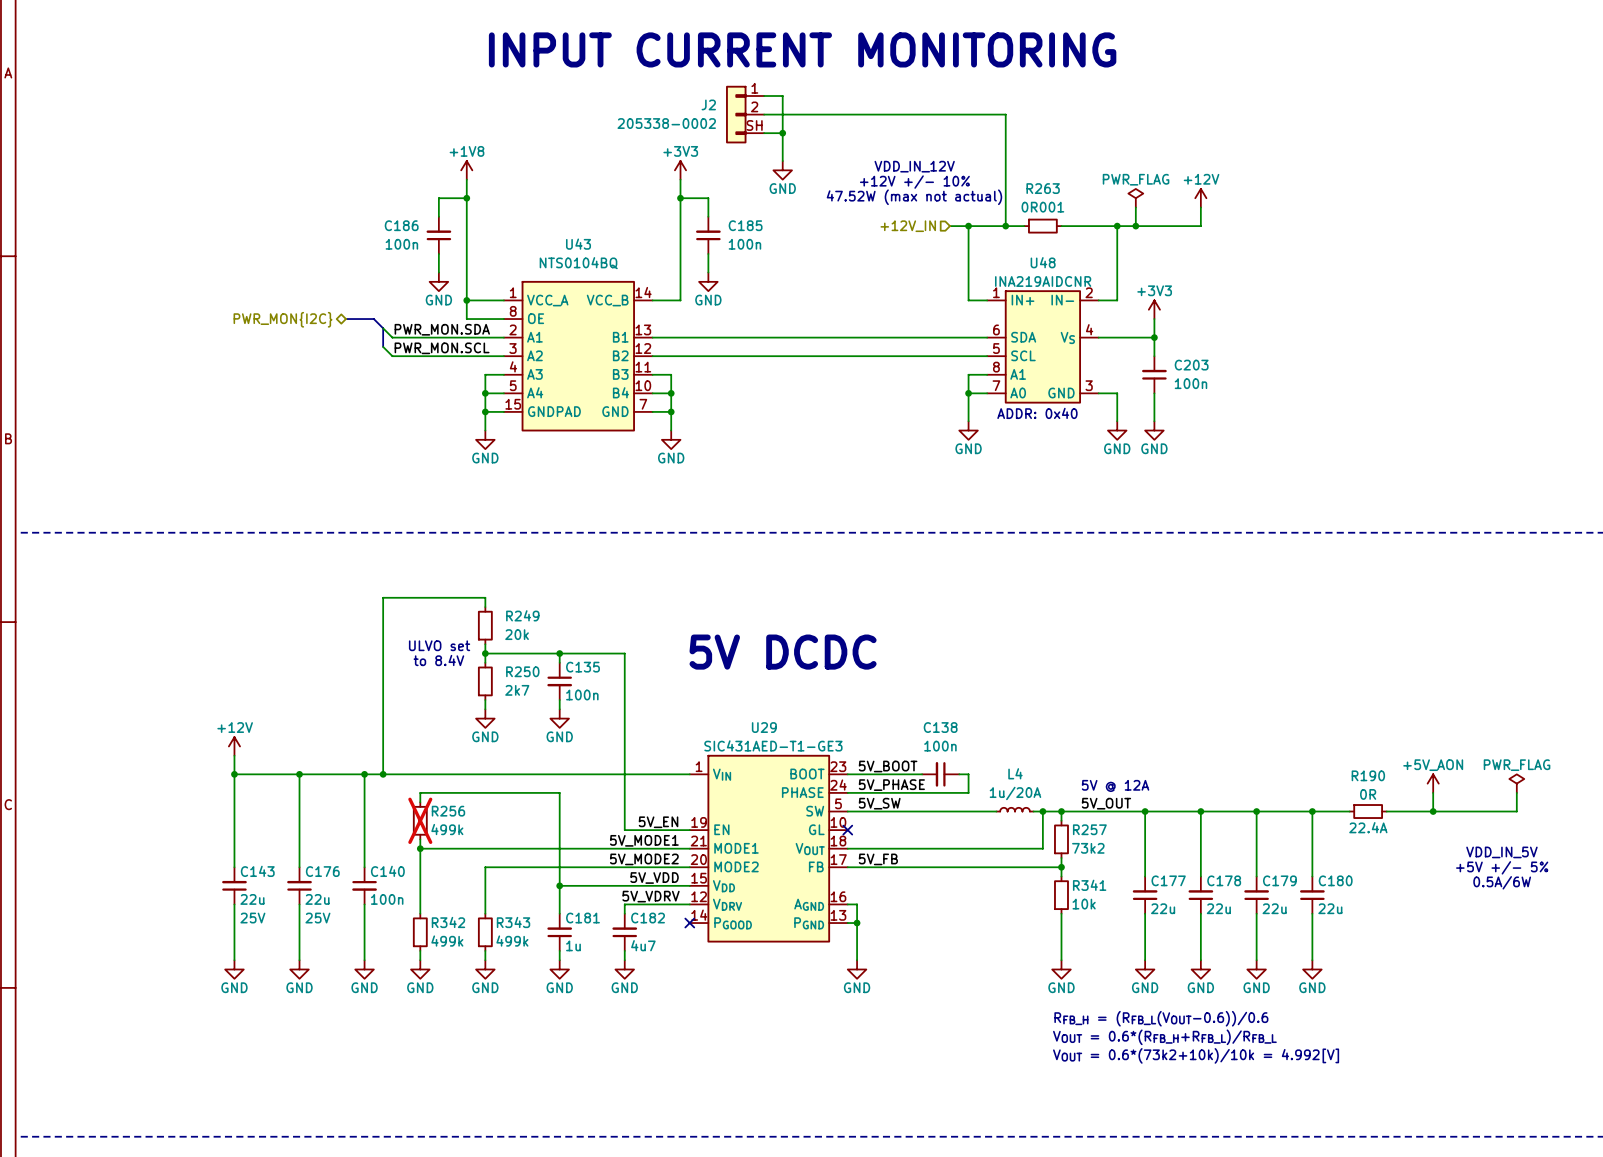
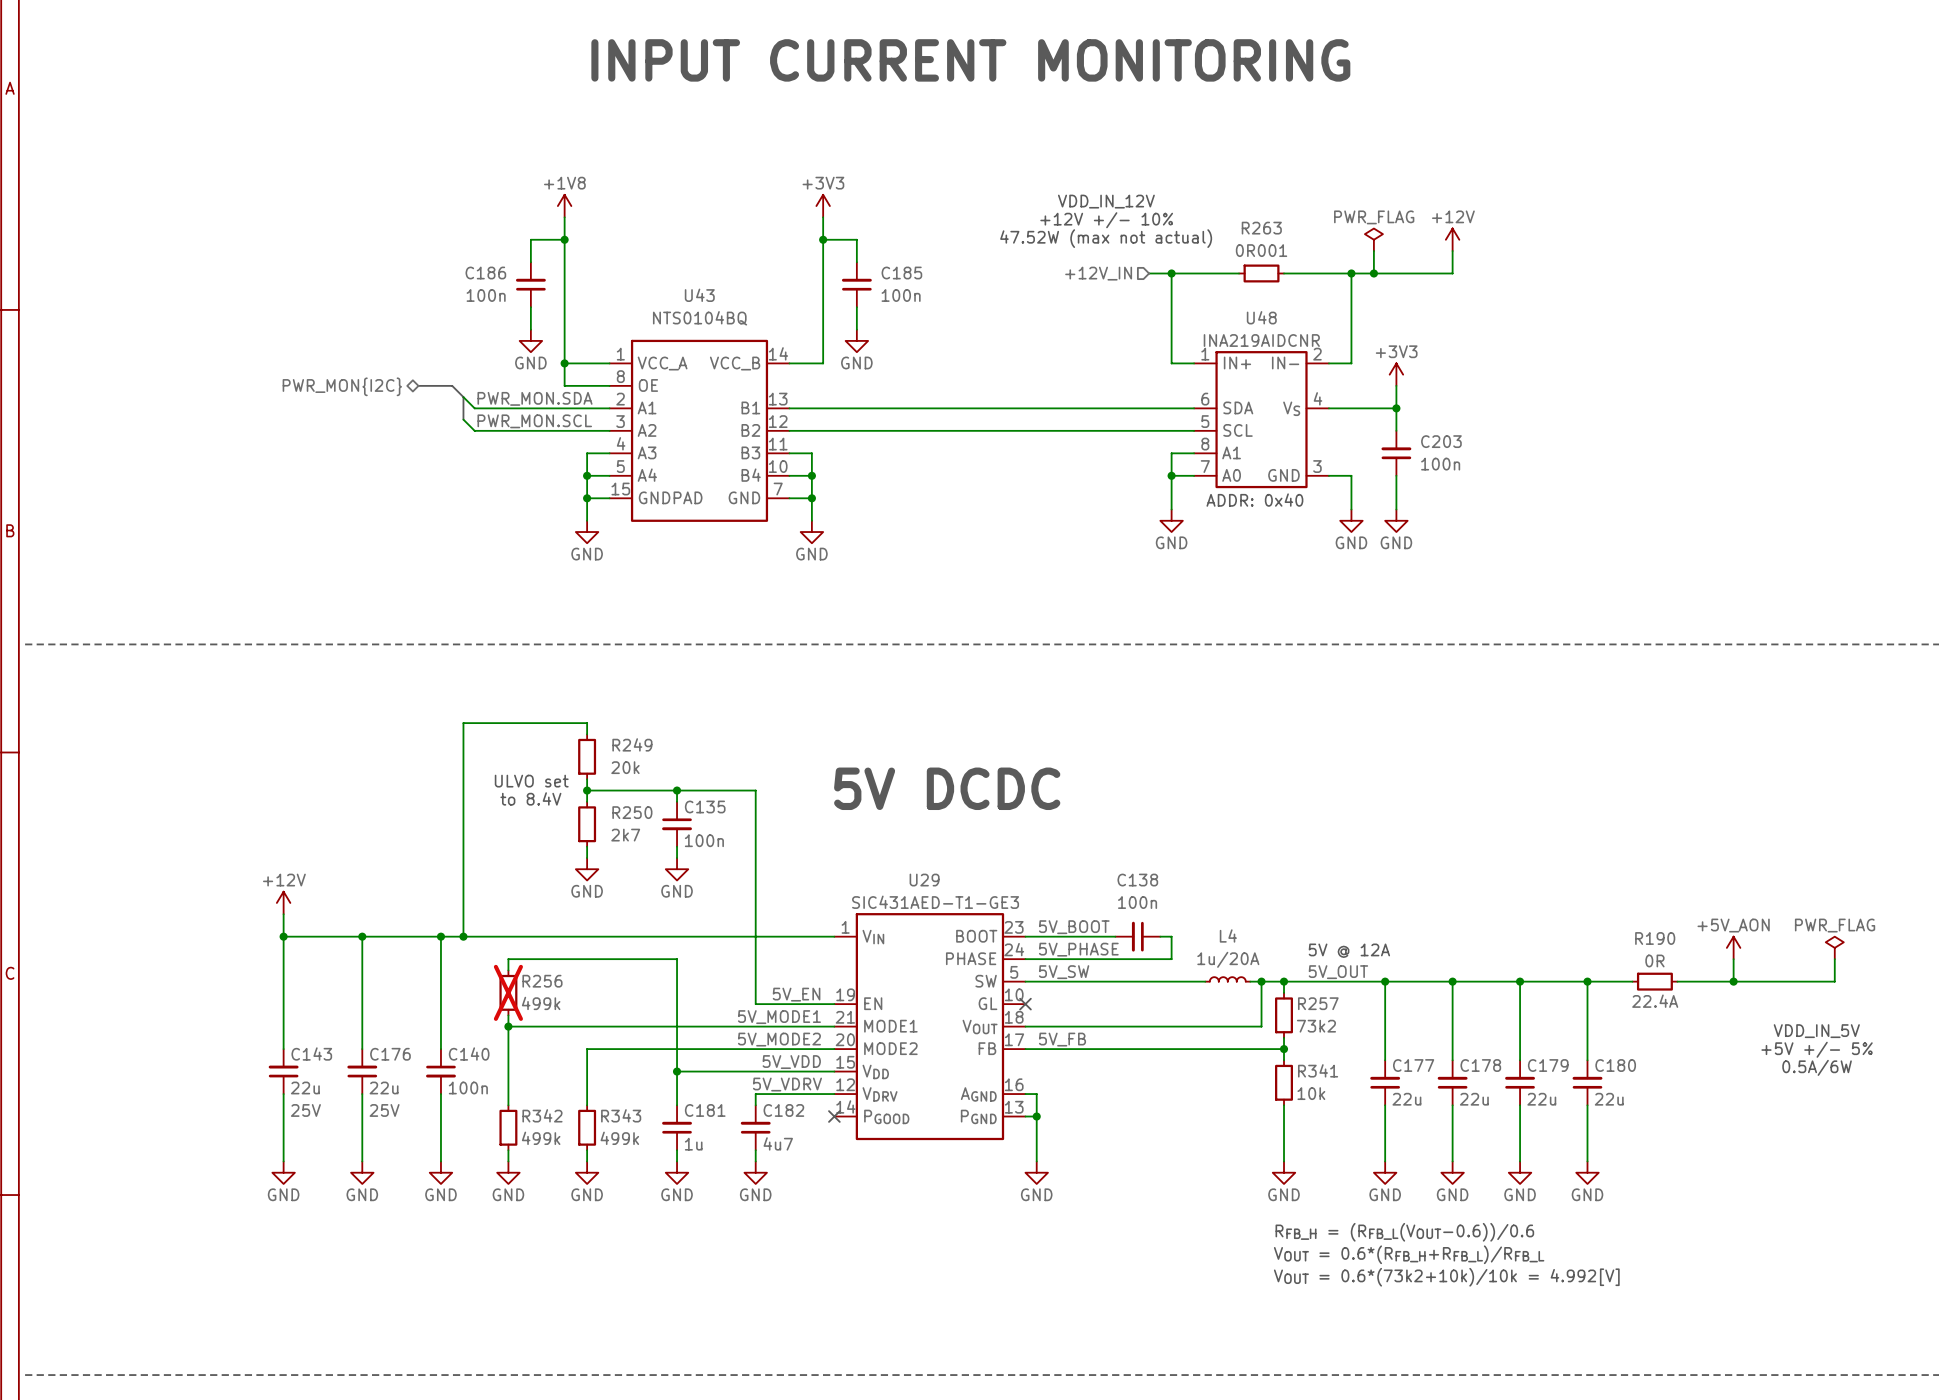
wire: (764, 96) (782, 96) (782, 161) -> none
J2: (745, 114) -> none
wire: (764, 114) (1005, 114) (1005, 226) -> none
wire: (764, 133) (782, 133) -> none
junction: (782, 133) -> none
power symbol: GND (782, 170) -> none
junction: (1005, 226) -> none

